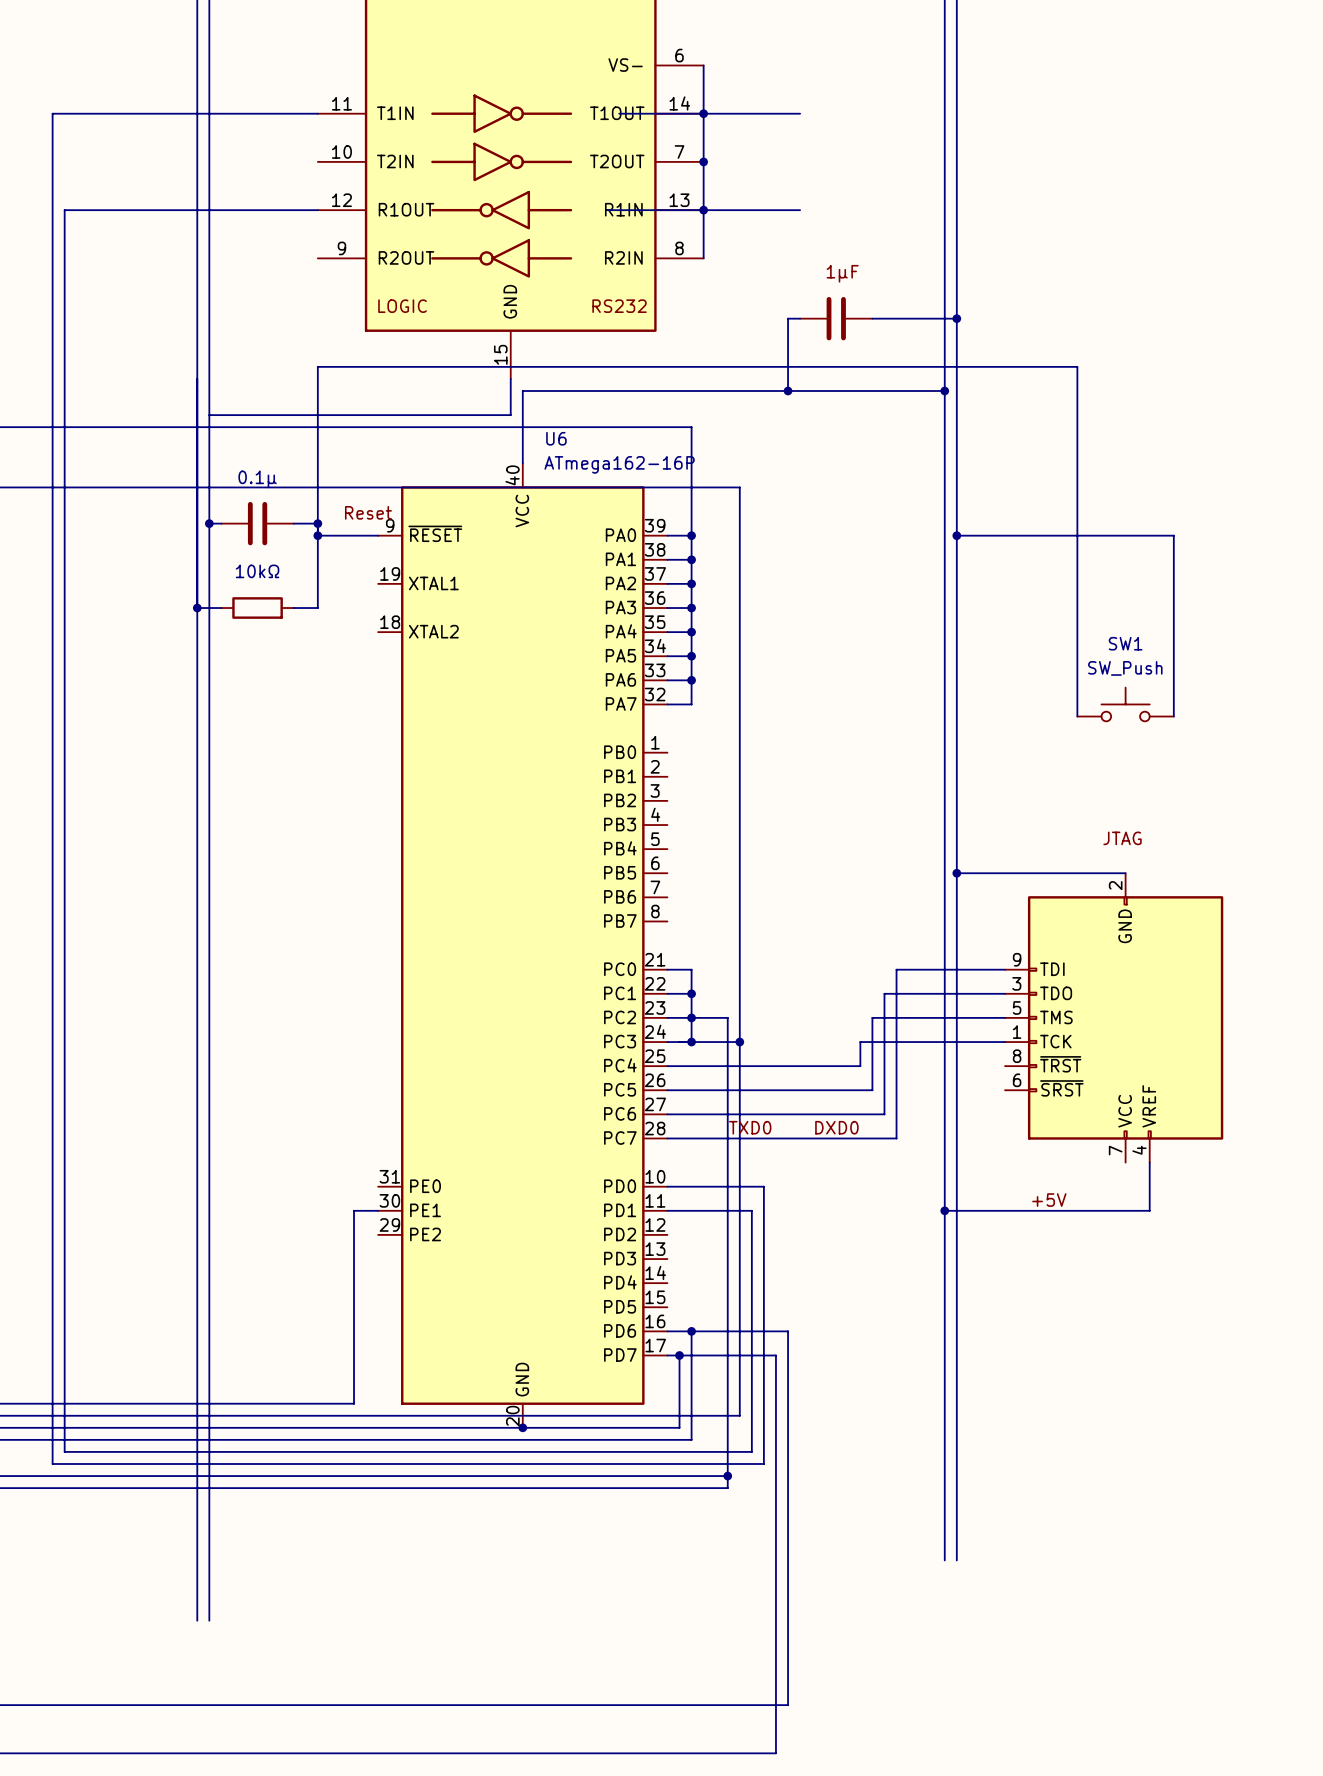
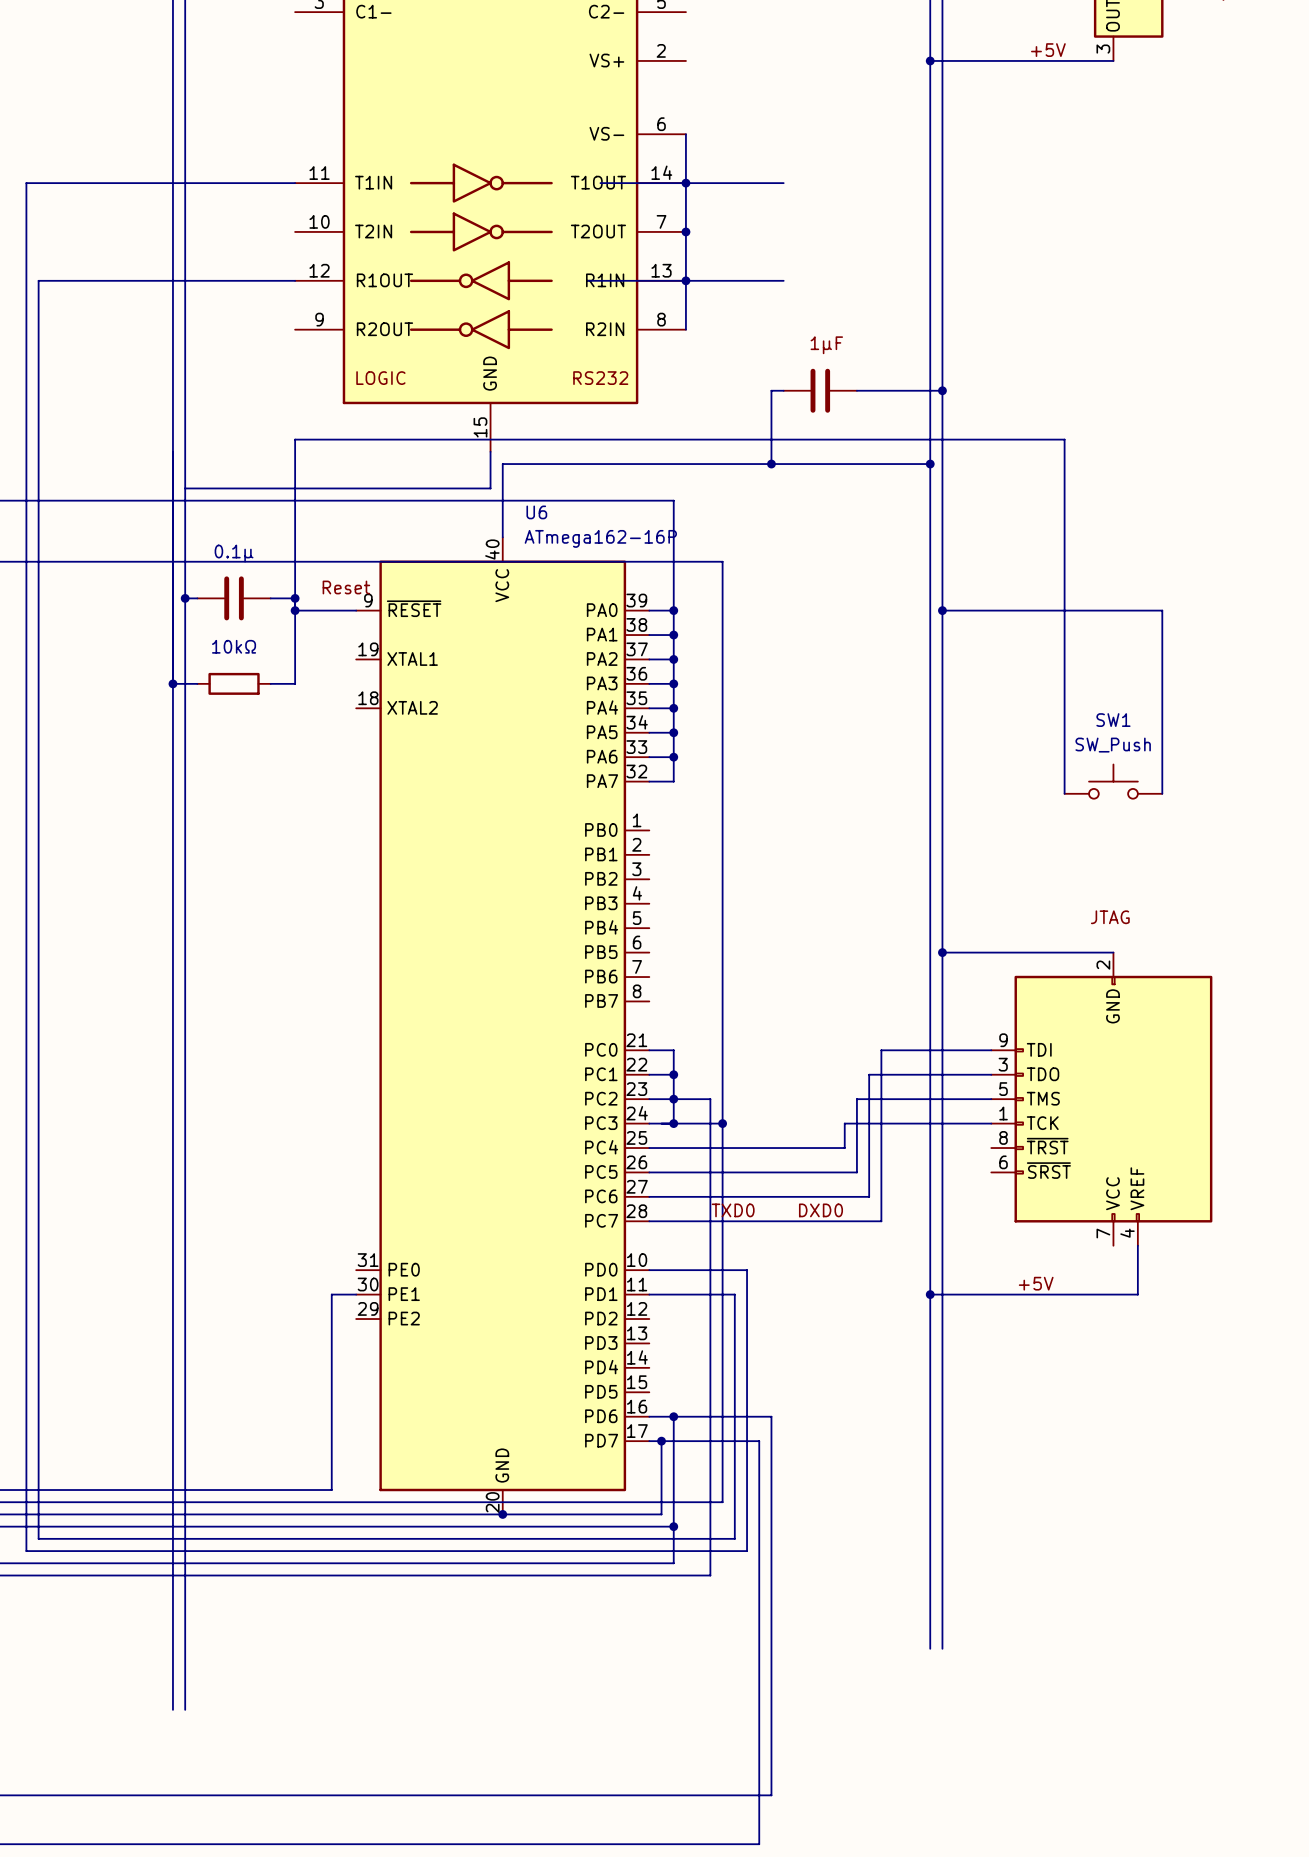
wire: (691, 1476) (727, 1476) -> (673, 1563) (673, 1526)
junction position: (727, 1476) -> (673, 1526)

